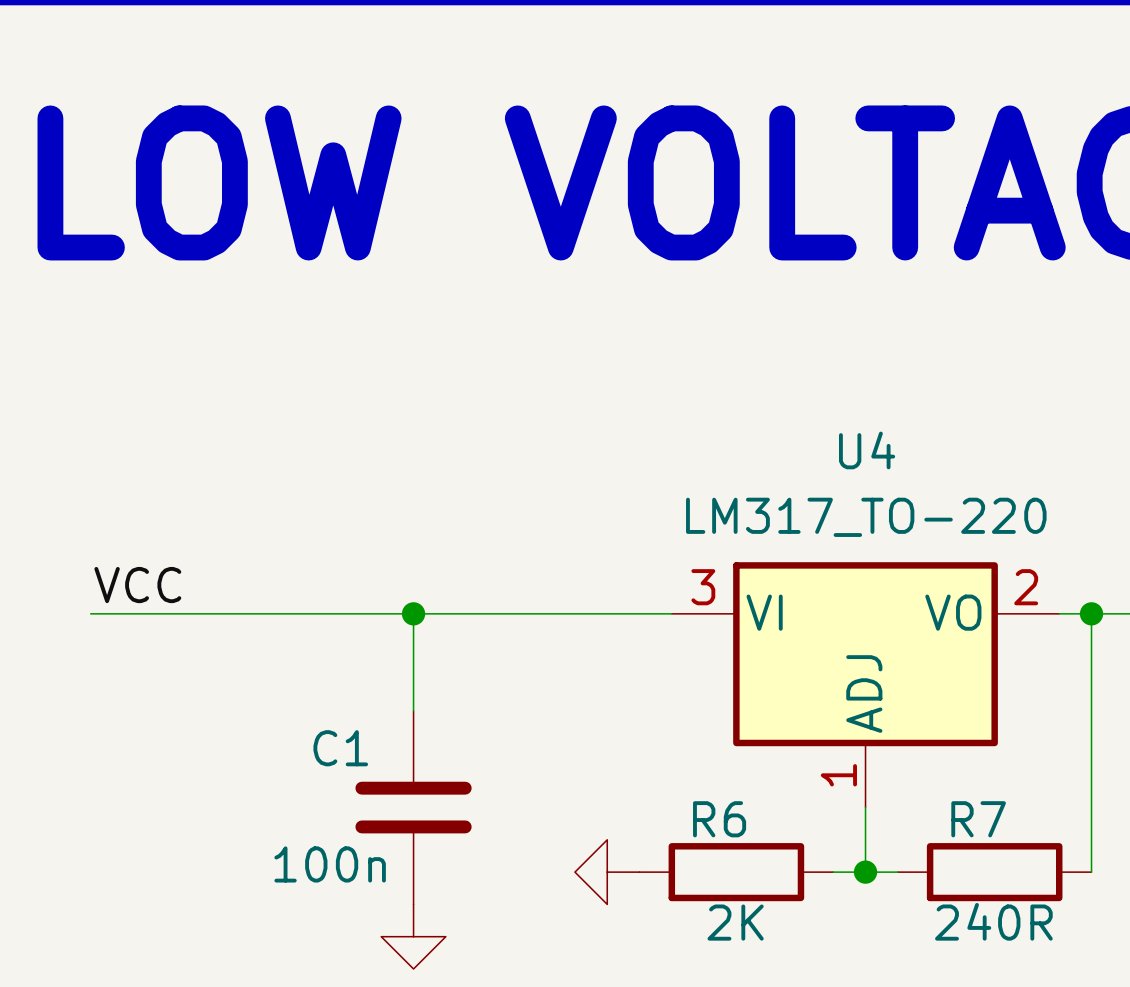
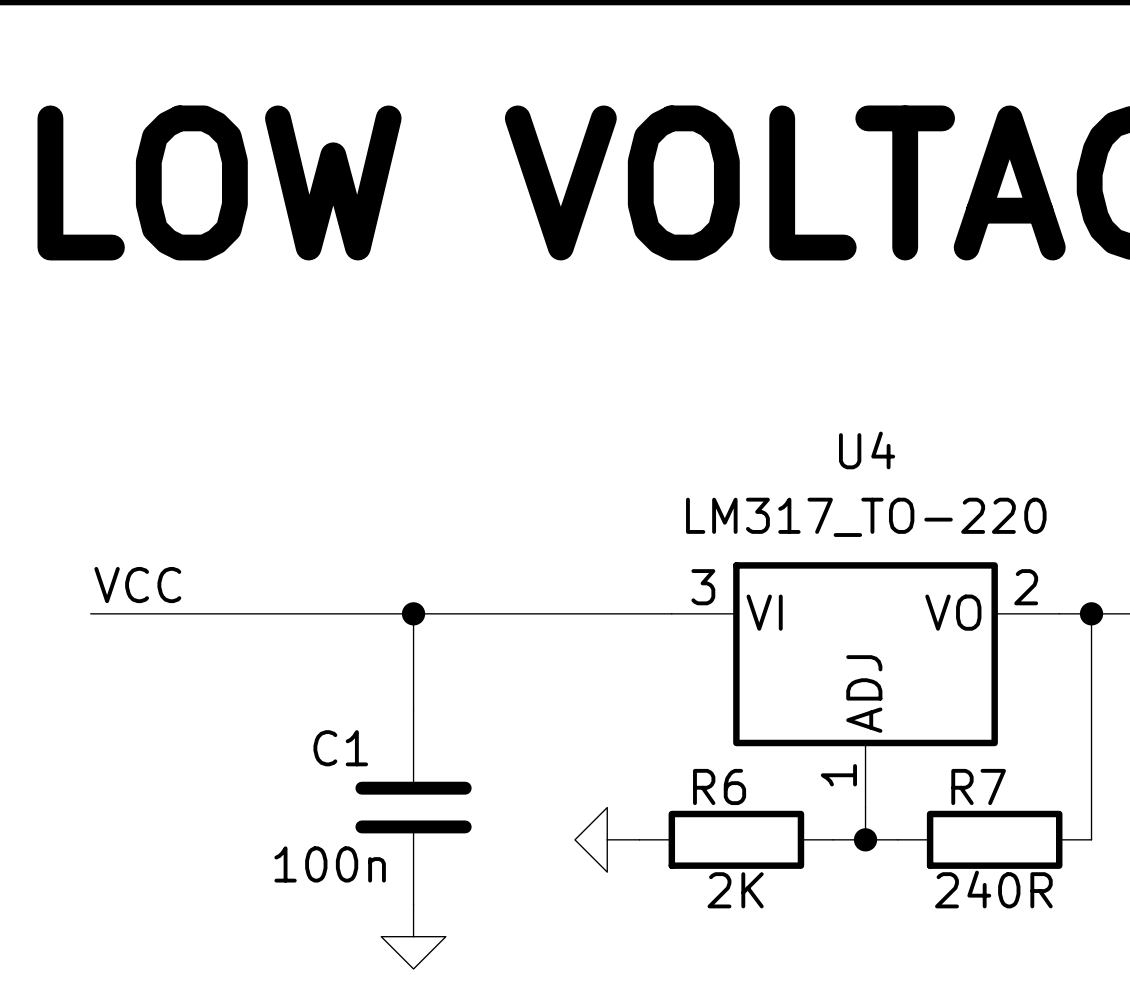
wire: (865, 839) (865, 872) -> none
wire: (1091, 839) (1091, 872) -> none
power symbol position: (607, 872) -> (607, 839)
R6 position: (736, 872) -> (736, 839)
wire: (833, 872) (897, 872) -> (833, 839) (897, 839)
junction position: (865, 872) -> (865, 839)
R7 position: (994, 872) -> (994, 839)

